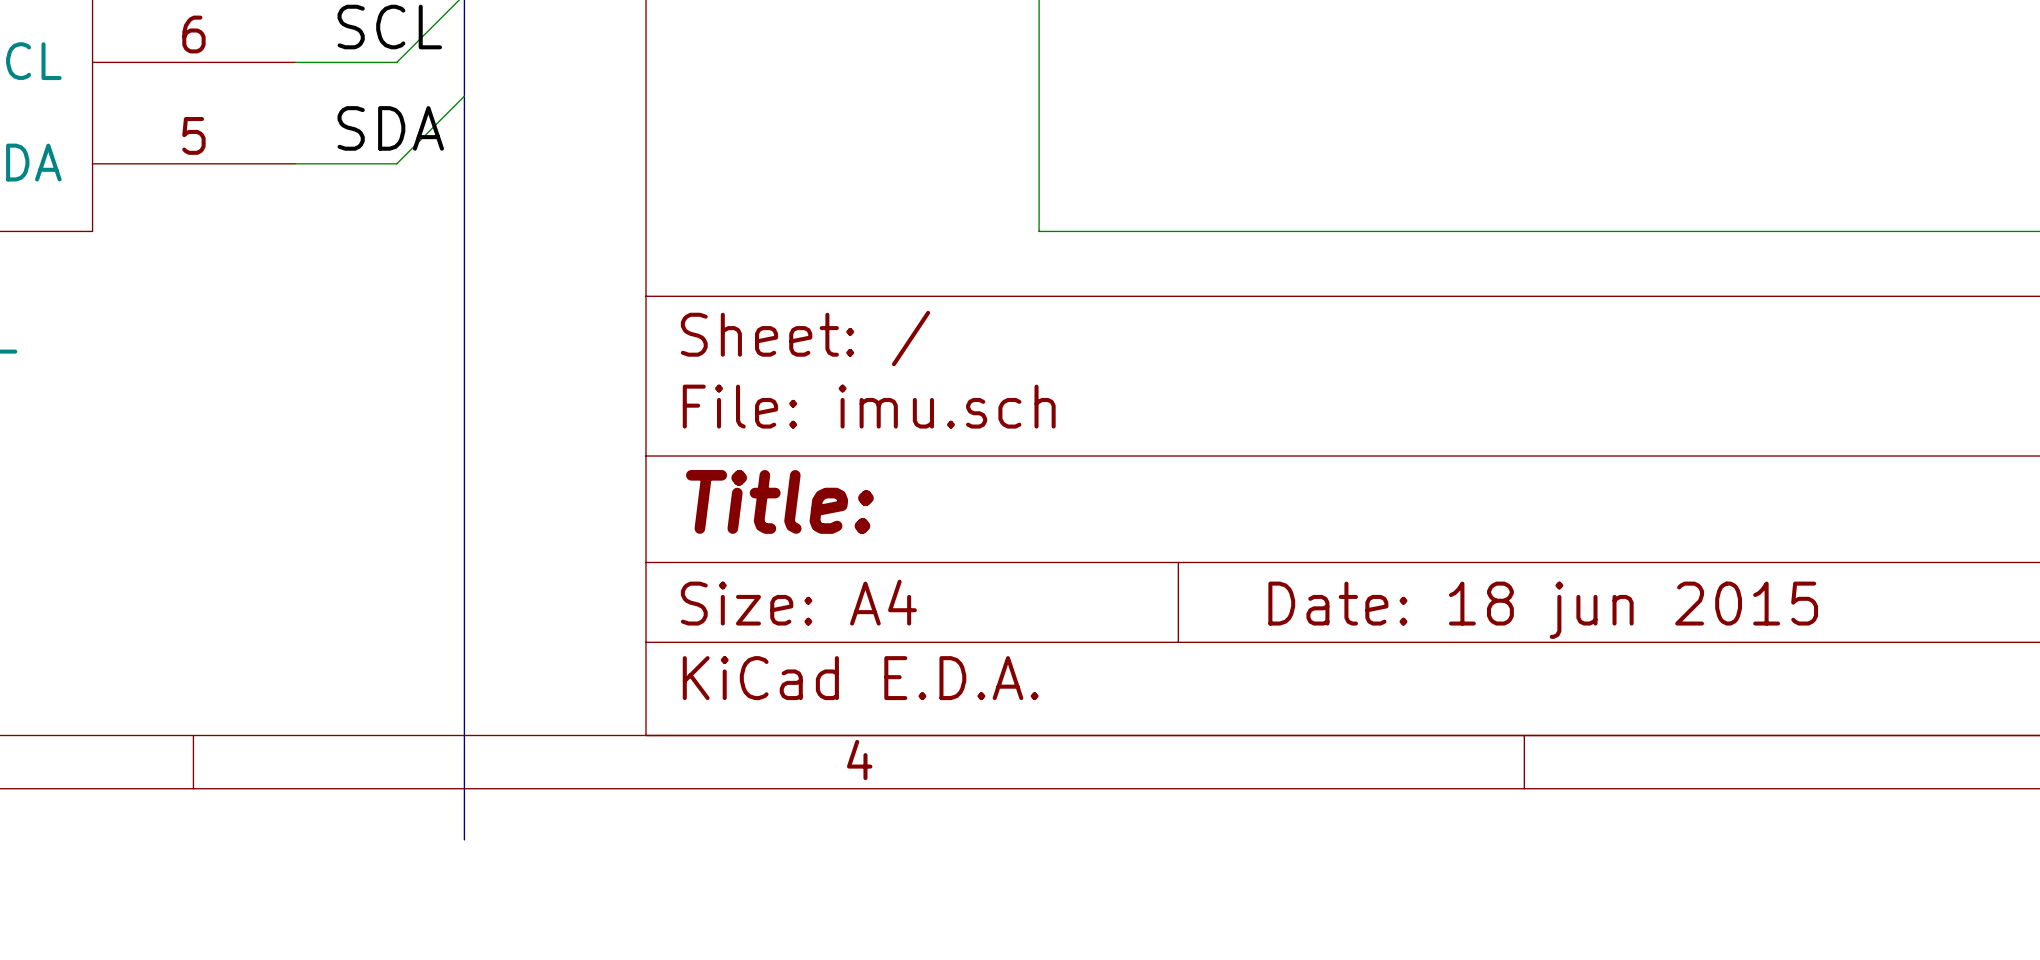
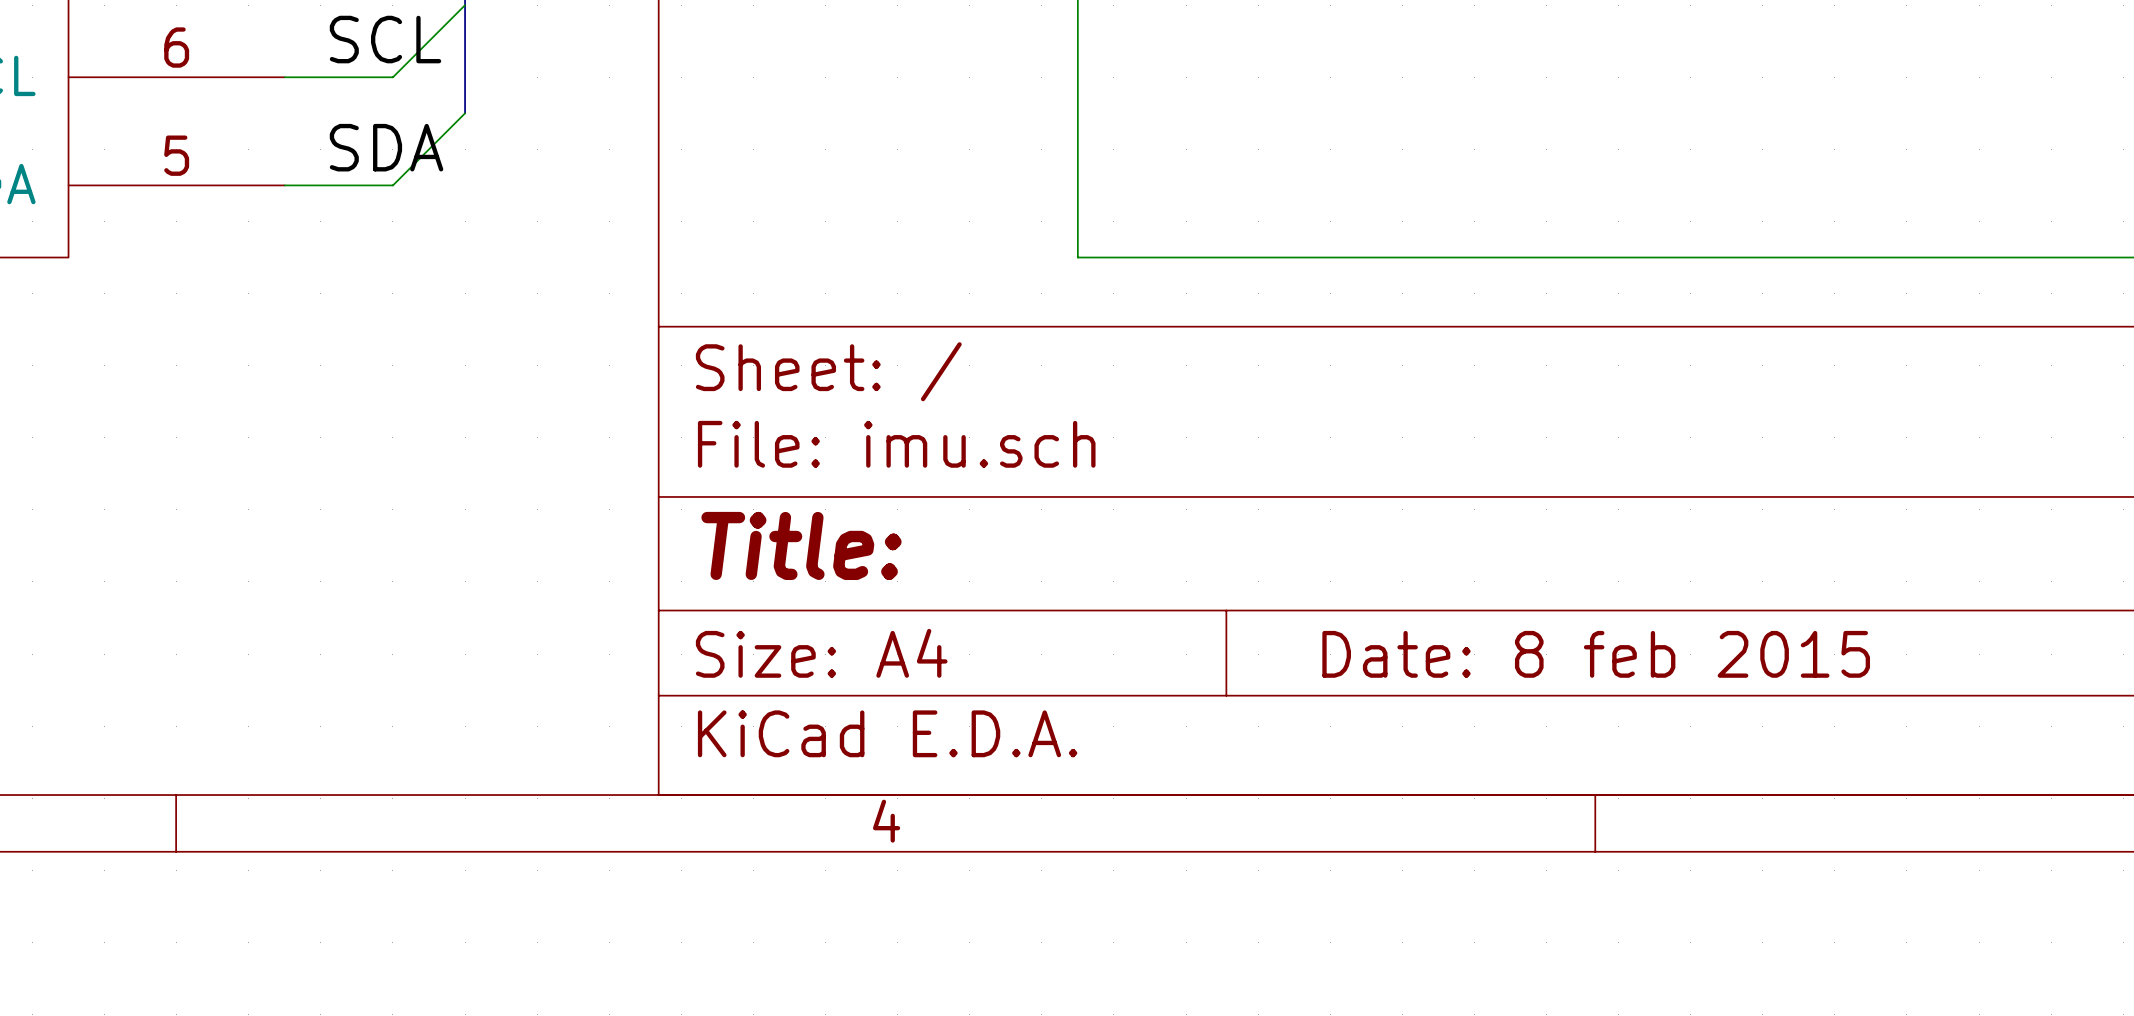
bus: (464, 96) (464, 839) -> none
title block: Date: 18 jun 2015 (1543, 610) -> Date: 8 feb 2015 (1596, 654)

